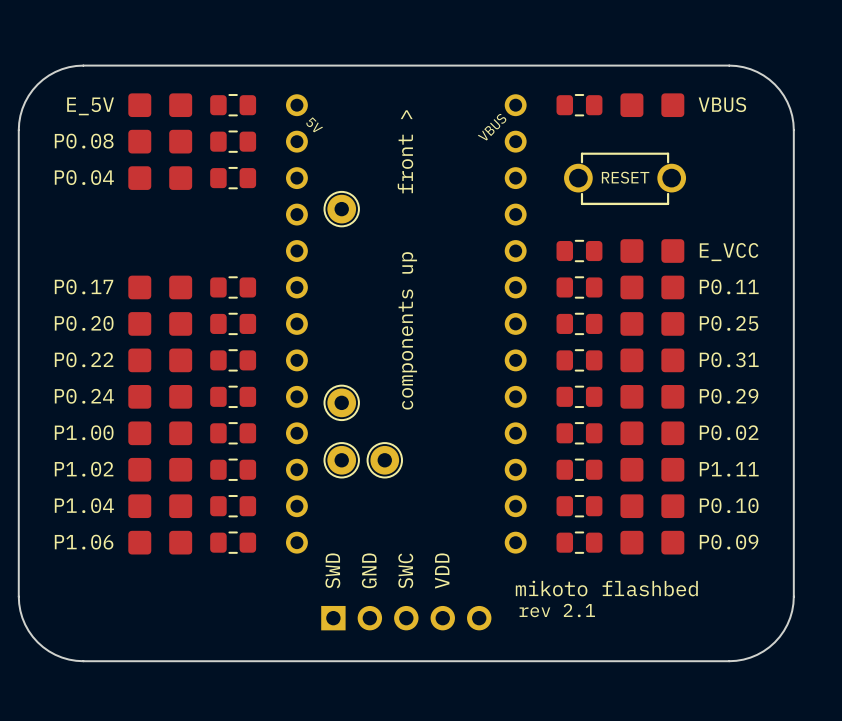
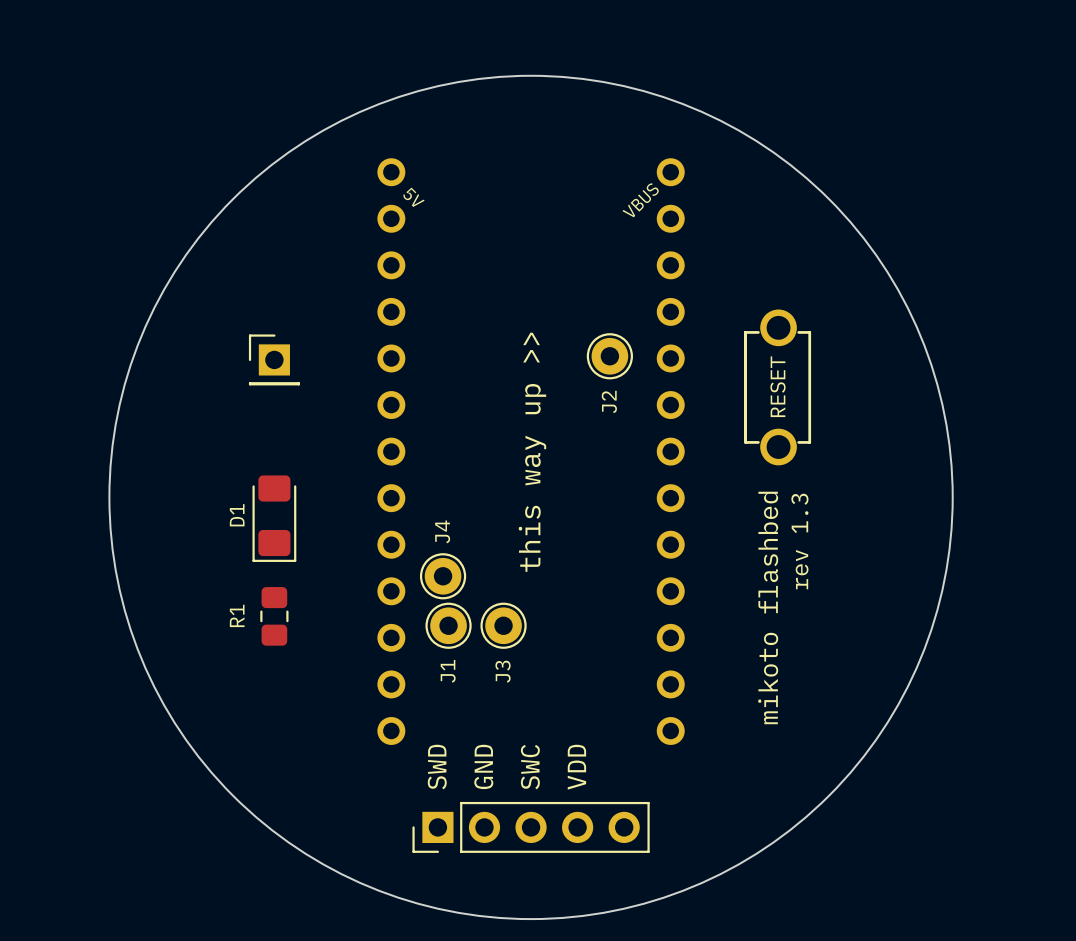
round board edge: none -> [108, 74, 954, 921]
board edge: (83, 65) (729, 65) (750, 69) (769, 79) (779, 89) (787, 102) (792, 115) (793, 130) (793, 596) (790, 617) (779, 636) (769, 647) (757, 654) (743, 659) (729, 661) (83, 661) (62, 657) (43, 647) (32, 636) (25, 624) (20, 611) (18, 596) (19, 122) (25, 102) (37, 84) (49, 75) (62, 69) (83, 65) -> none
text: VBUS (722, 104) -> none
part: (160, 105) -> none
part: (233, 105) -> none
part: (579, 105) -> none
part: (652, 105) -> none
text: E_5V (90, 106) -> none
text: P0.08 (84, 141) -> none
part: (160, 141) -> none
part: (233, 141) -> none
text: front > (405, 151) -> none
text: P0.04 (84, 177) -> none
part: (160, 178) -> none
part: (233, 178) -> none
part rotation: 0° (625, 178) -> 90° clockwise (777, 387)
part position: (625, 178) -> (777, 387)
part: (341, 209) -> none
J2: none -> (609, 356)
part: (579, 251) -> none
part: (652, 251) -> none
part: none -> (274, 359)
text: E_VCC (729, 252) -> none
text: P0.17 (84, 286) -> none
text: P0.11 (729, 286) -> none
part: (160, 287) -> none
part: (233, 287) -> none
part: (579, 287) -> none
part: (652, 287) -> none
text: P0.20 (84, 323) -> none
part: (160, 323) -> none
part: (233, 323) -> none
part: (579, 323) -> none
part: (652, 323) -> none
text: P0.25 (729, 323) -> none
text: components up (407, 330) -> this way up >> (532, 452)
text: P0.22 (84, 359) -> none
text: P0.31 (729, 359) -> none
part: (160, 360) -> none
part: (233, 360) -> none
part: (579, 360) -> none
part: (652, 360) -> none
D1: none -> (274, 518)
text: none -> rev 1.3 (799, 541)
text: P0.24 (84, 396) -> none
part: (160, 396) -> none
part: (233, 396) -> none
part: (579, 396) -> none
part: (652, 396) -> none
text: P0.29 (729, 396) -> none
part: (341, 402) -> none
J4: none -> (443, 576)
text: P1.00 (84, 432) -> none
text: P0.02 (729, 432) -> none
part: (160, 433) -> none
part: (233, 433) -> none
part: (579, 433) -> none
part: (652, 433) -> none
R1: none -> (274, 616)
text: P1.02 (84, 469) -> none
part: (160, 469) -> none
part: (233, 469) -> none
part: (579, 469) -> none
part: (652, 469) -> none
text: P1.11 (729, 469) -> none
J1 name: none -> J1 (448, 671)
J3 name: none -> J3 (503, 671)
text: P1.04 (84, 505) -> none
text: P0.10 (729, 505) -> none
part: (160, 506) -> none
part: (233, 506) -> none
part: (579, 506) -> none
part: (652, 506) -> none
text: P1.06 (84, 542) -> none
part: (160, 542) -> none
part: (233, 542) -> none
part: (579, 542) -> none
part: (652, 542) -> none
text: P0.09 (729, 542) -> none
text rotation: 0° (606, 588) -> 90° counterclockwise (768, 607)
part footprint: [321, 605, 492, 631] -> [412, 801, 650, 853]
text: rev 2.1 (557, 610) -> none

